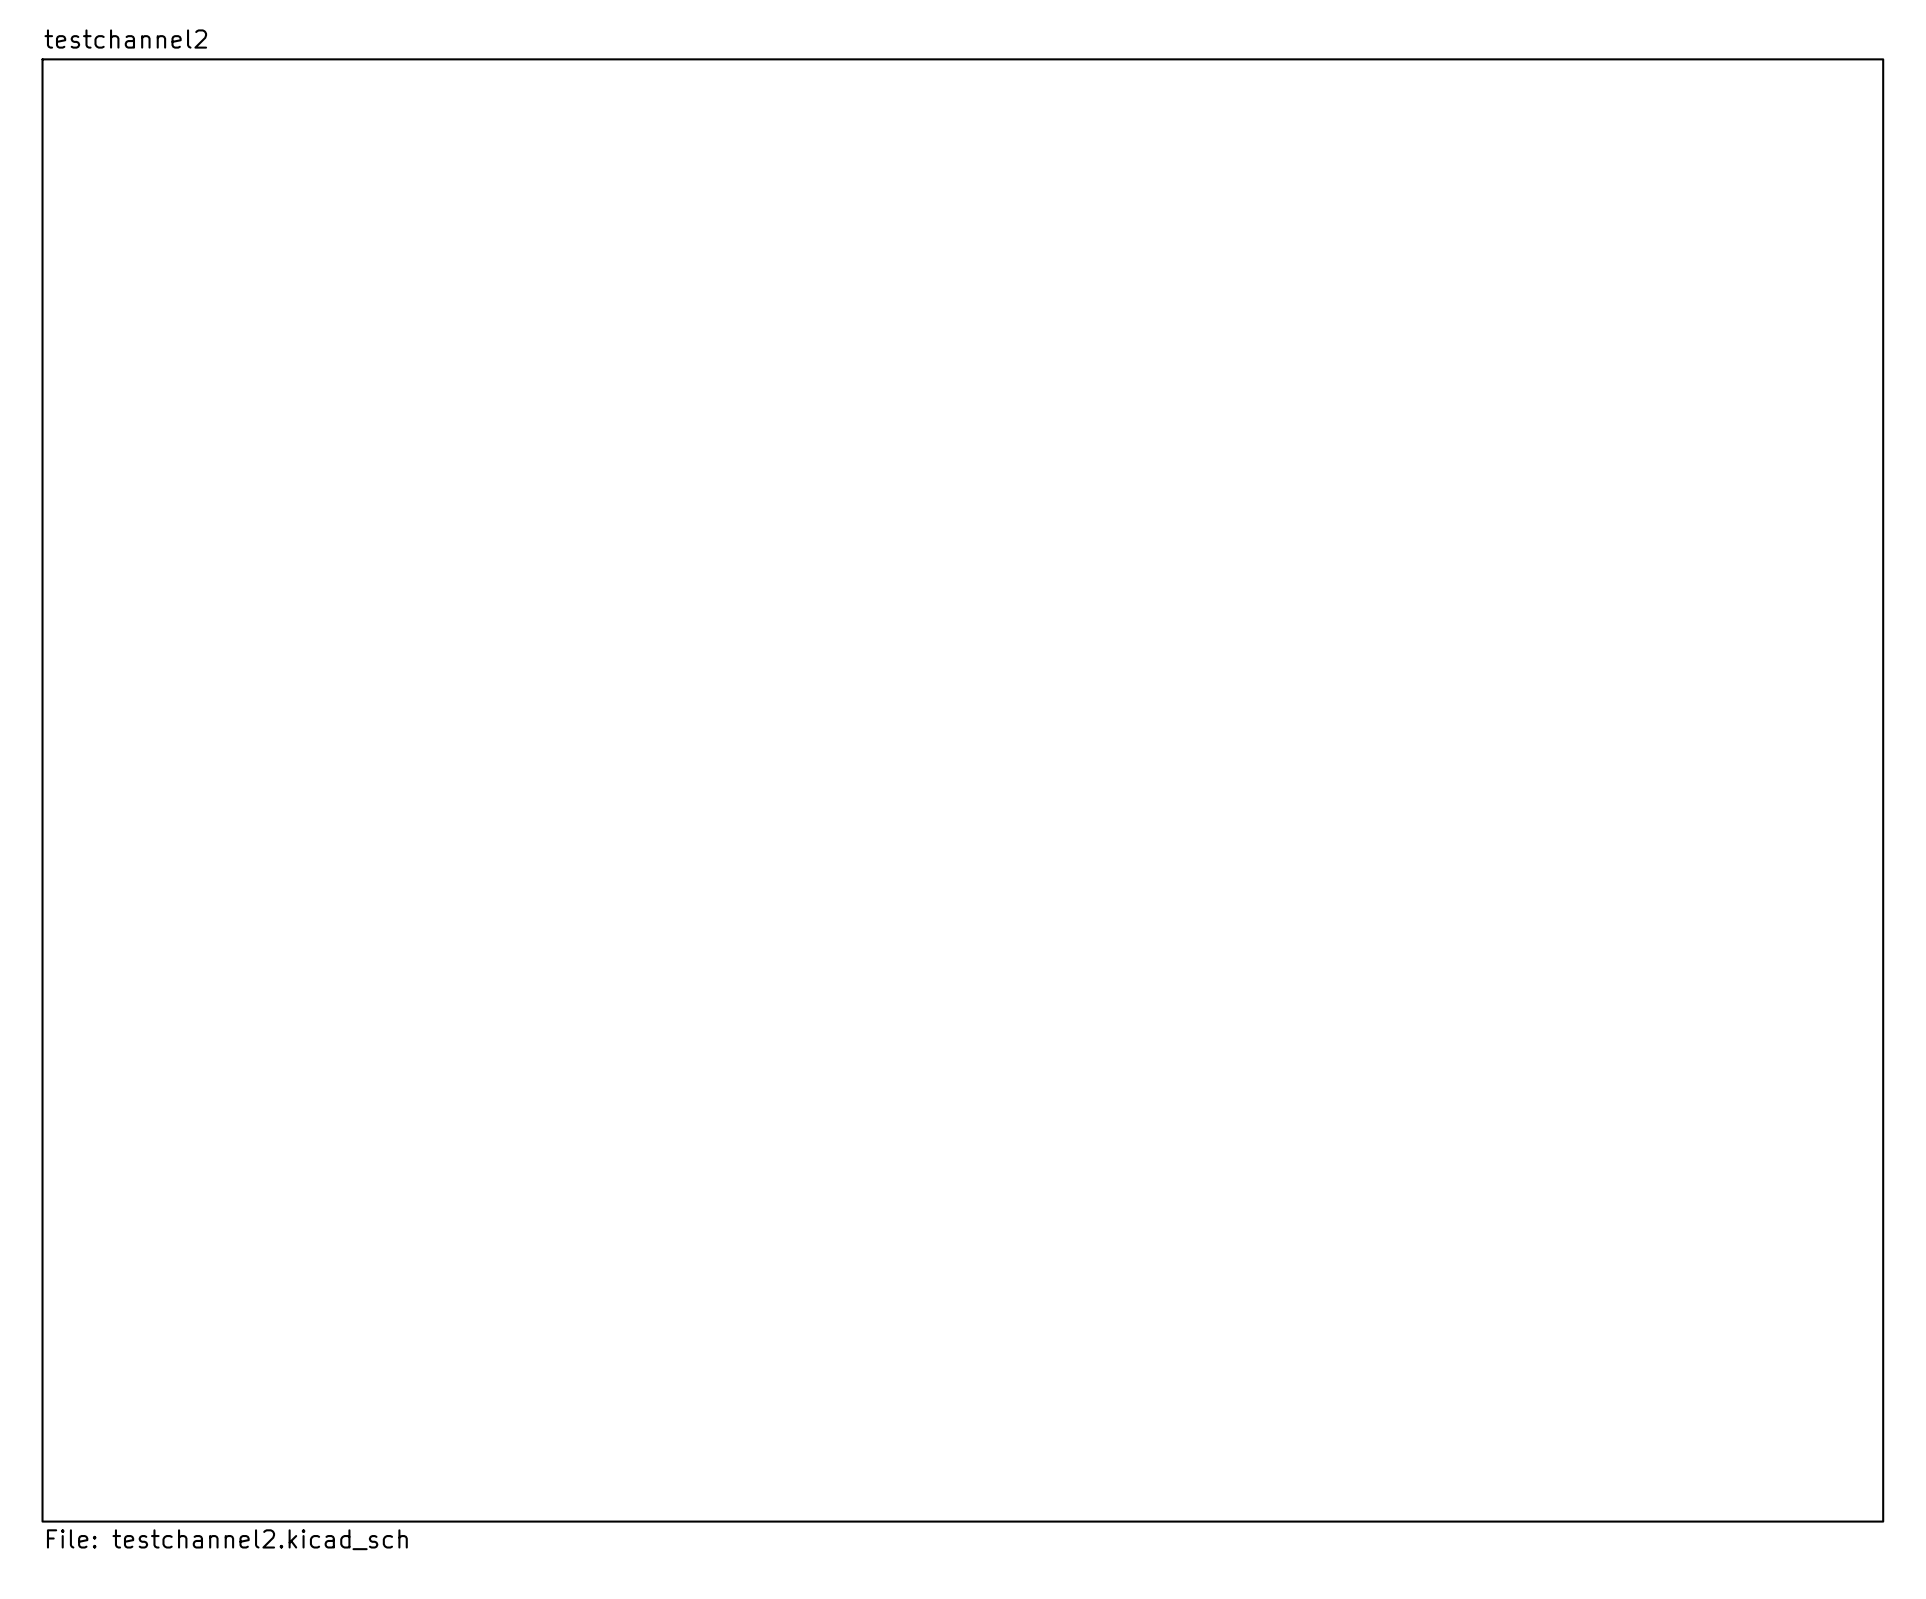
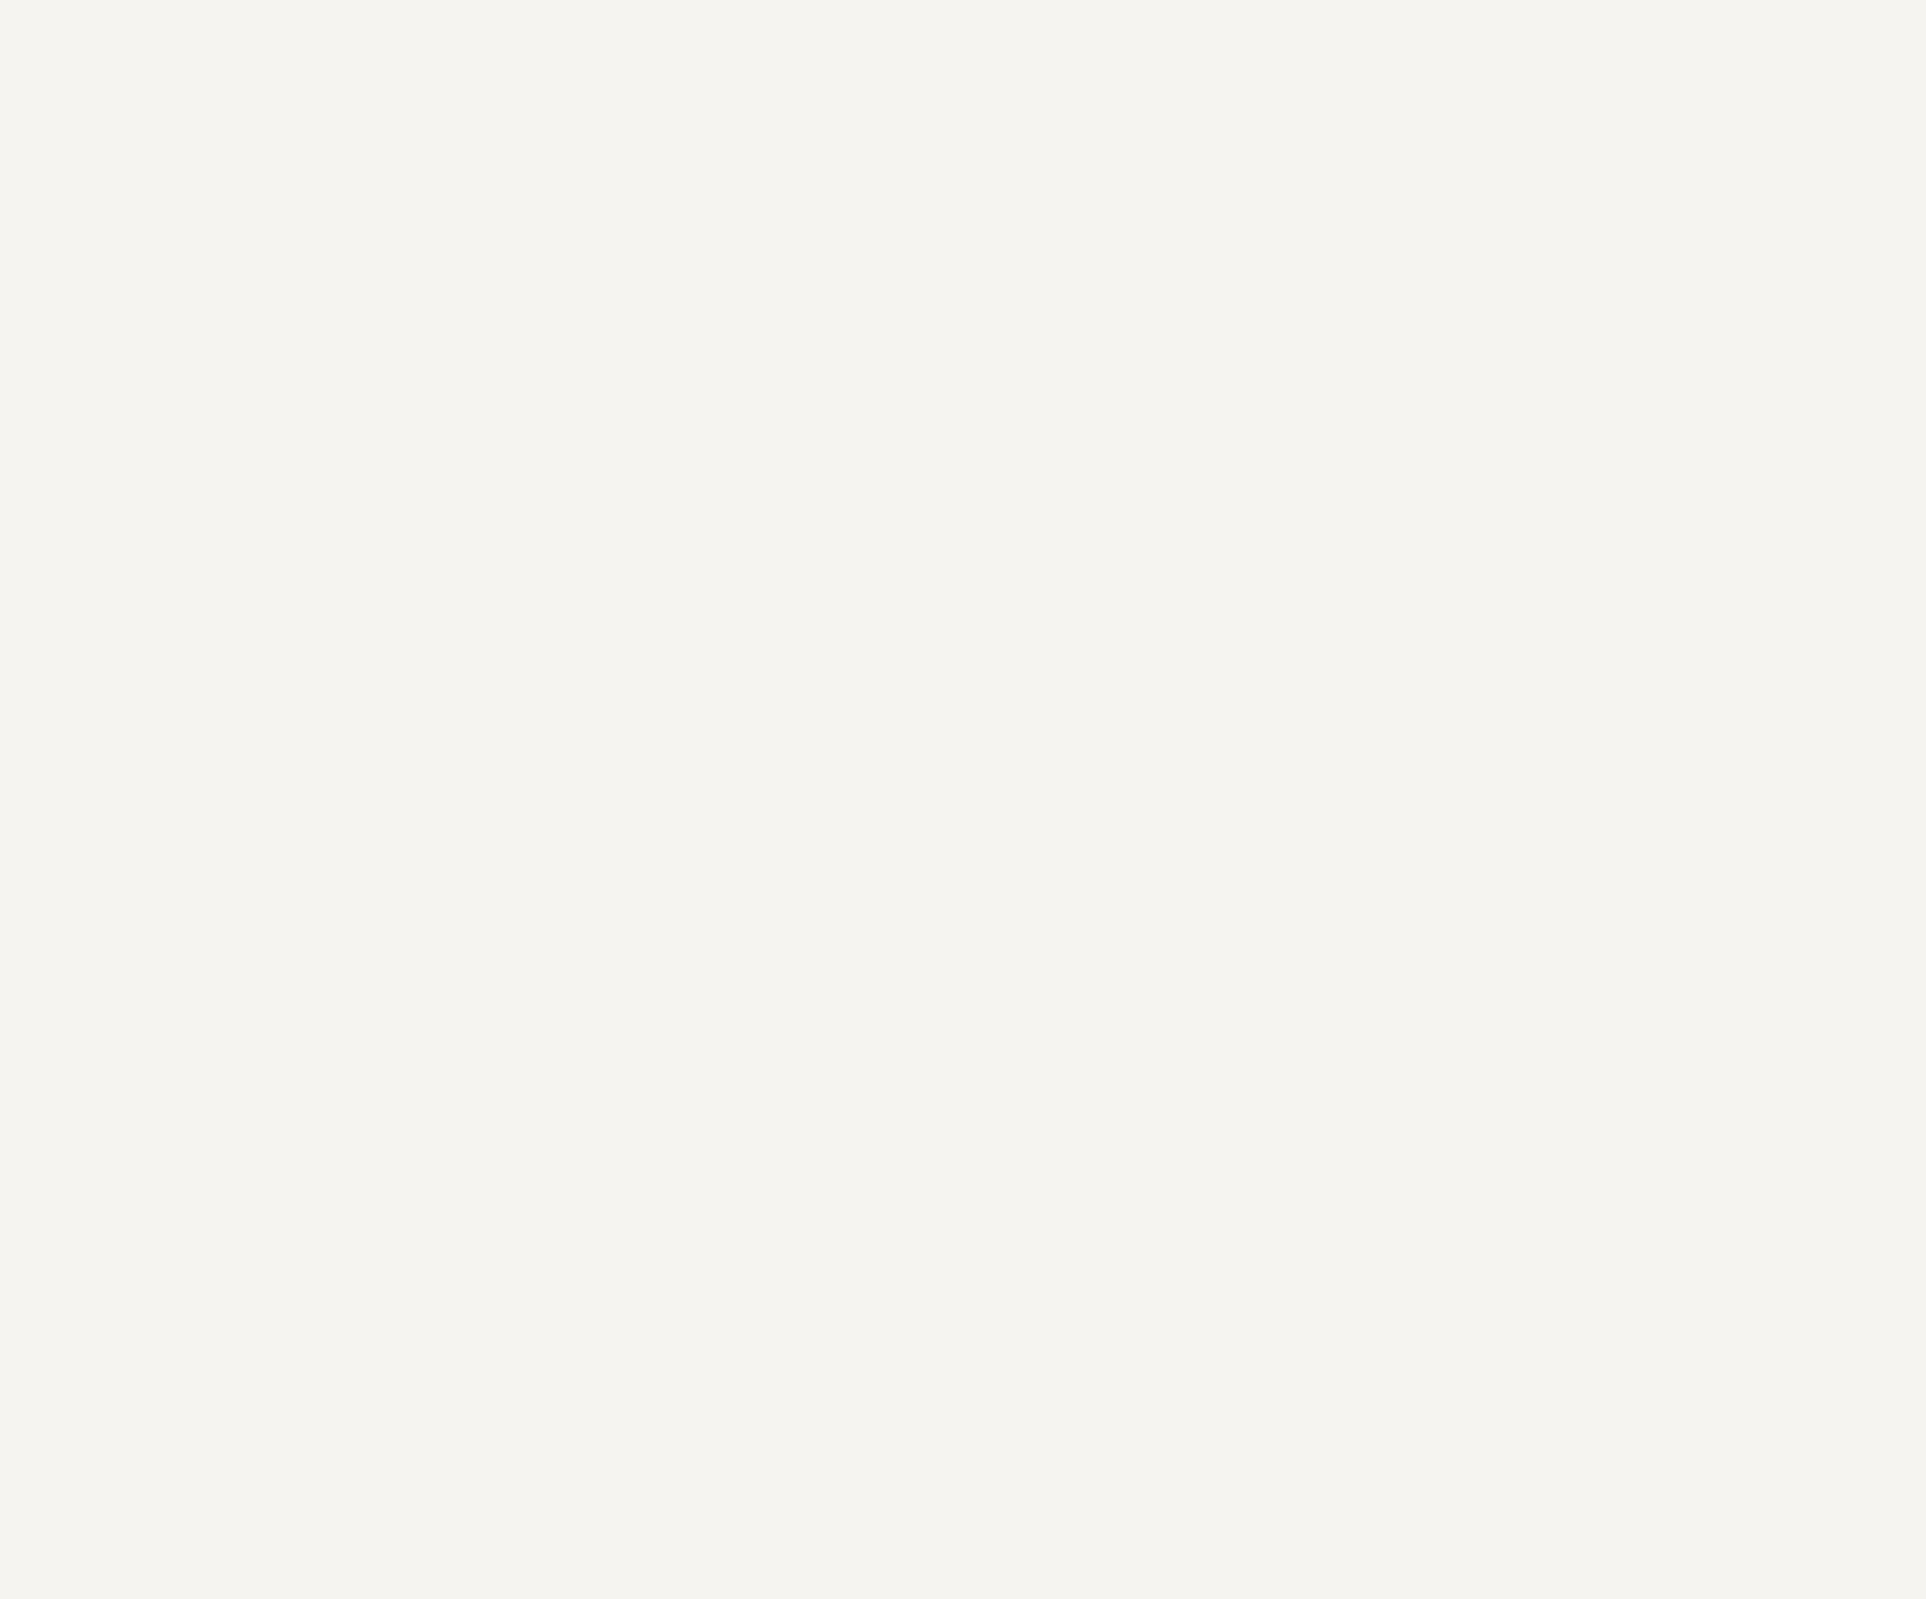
sheet testchannel2: File: testchannel2.kicad_sch (962, 790) -> none

